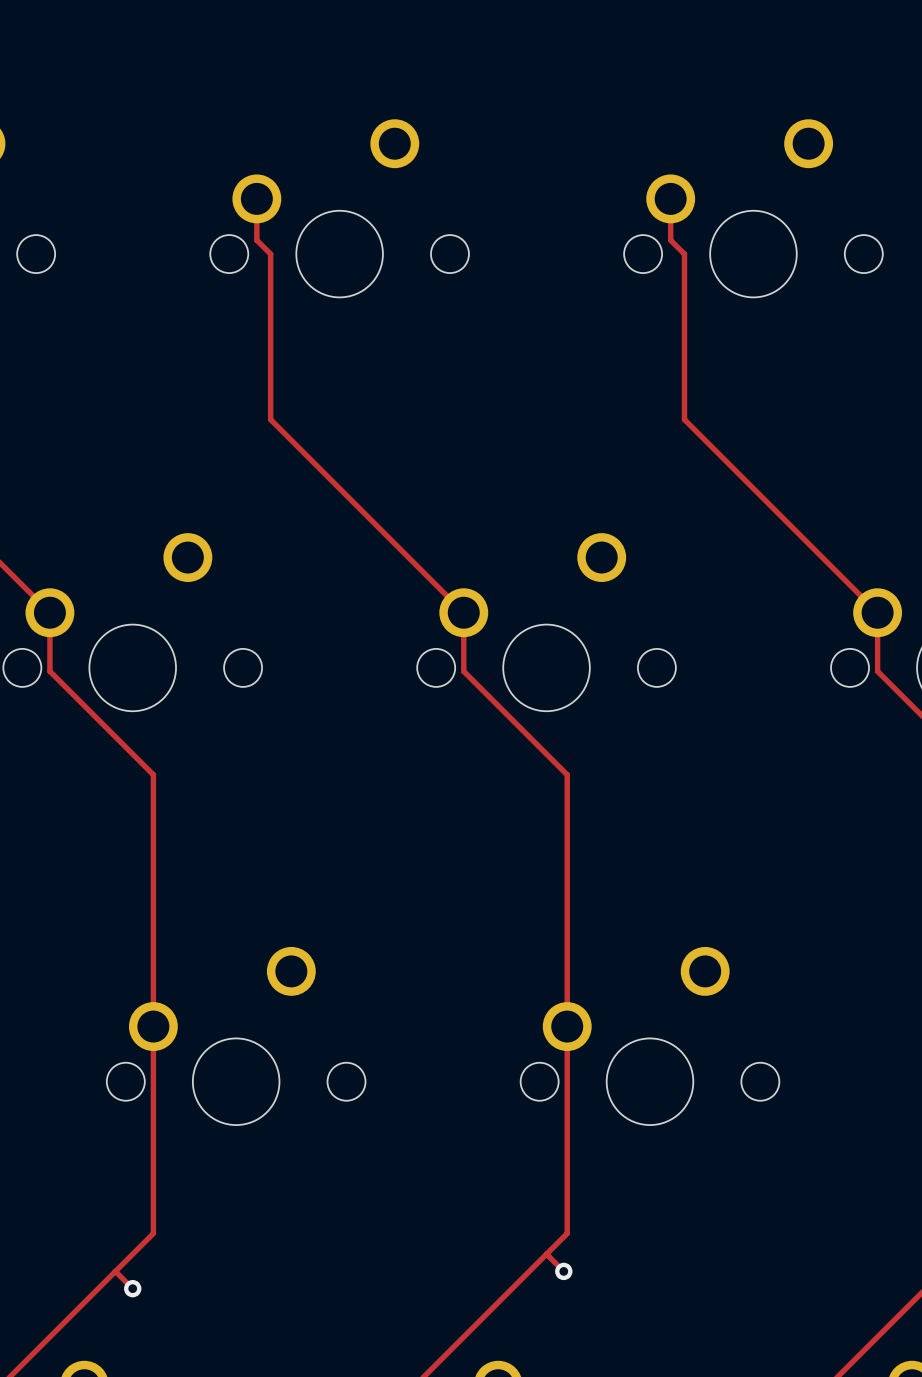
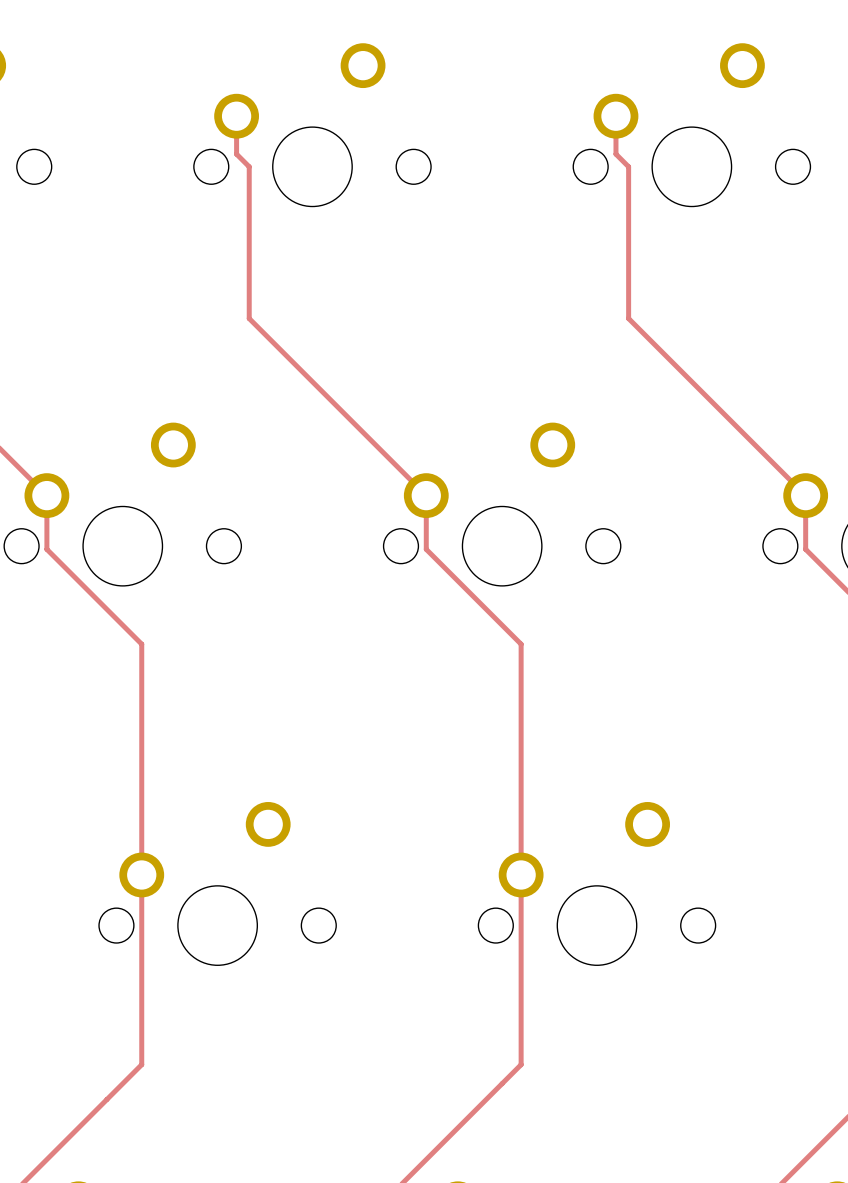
track: (546, 1254) (563, 1271) -> none
track: (115, 1271) (132, 1288) -> none
via: (563, 1271) -> none
via: (132, 1288) -> none

